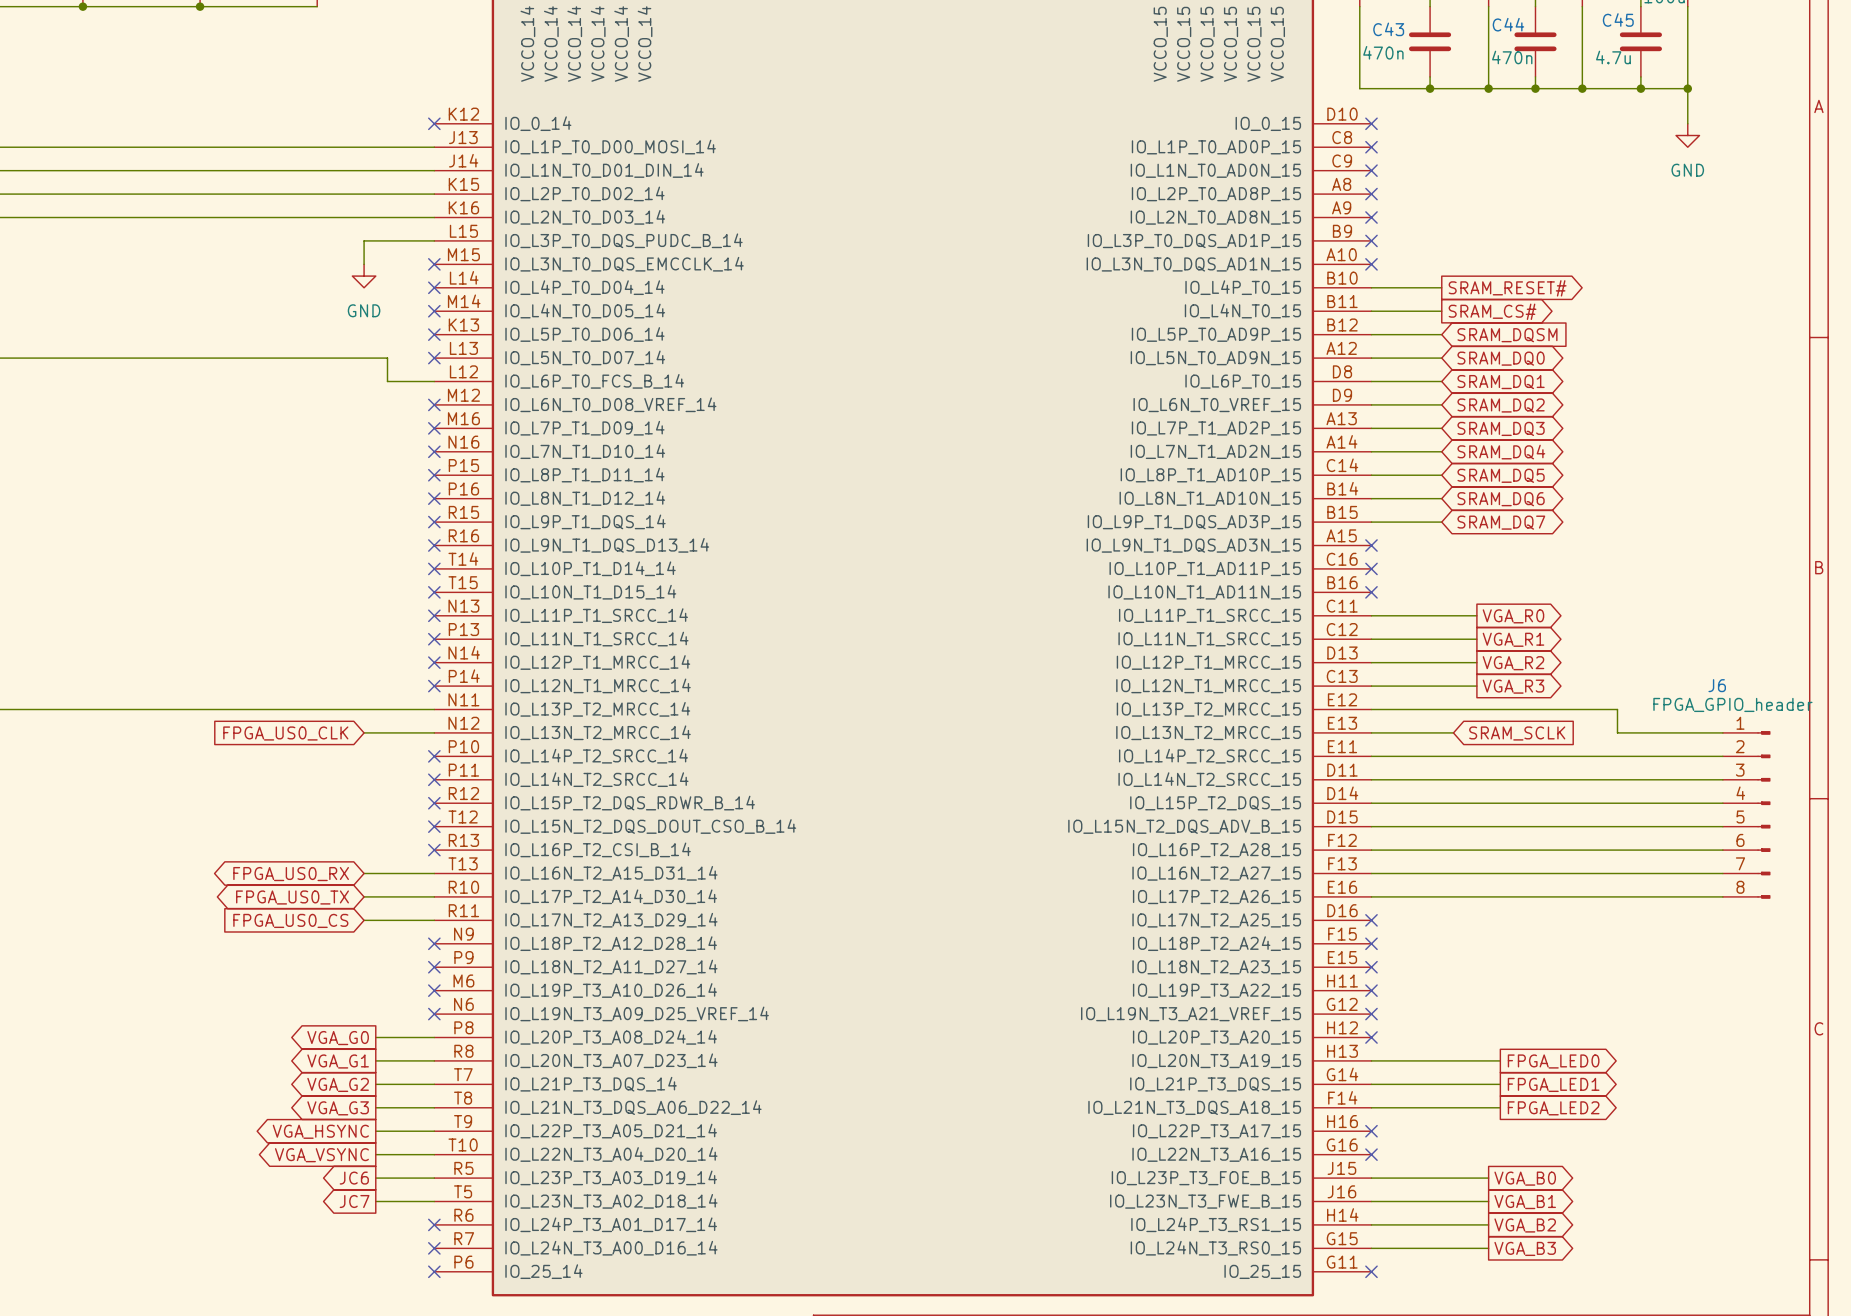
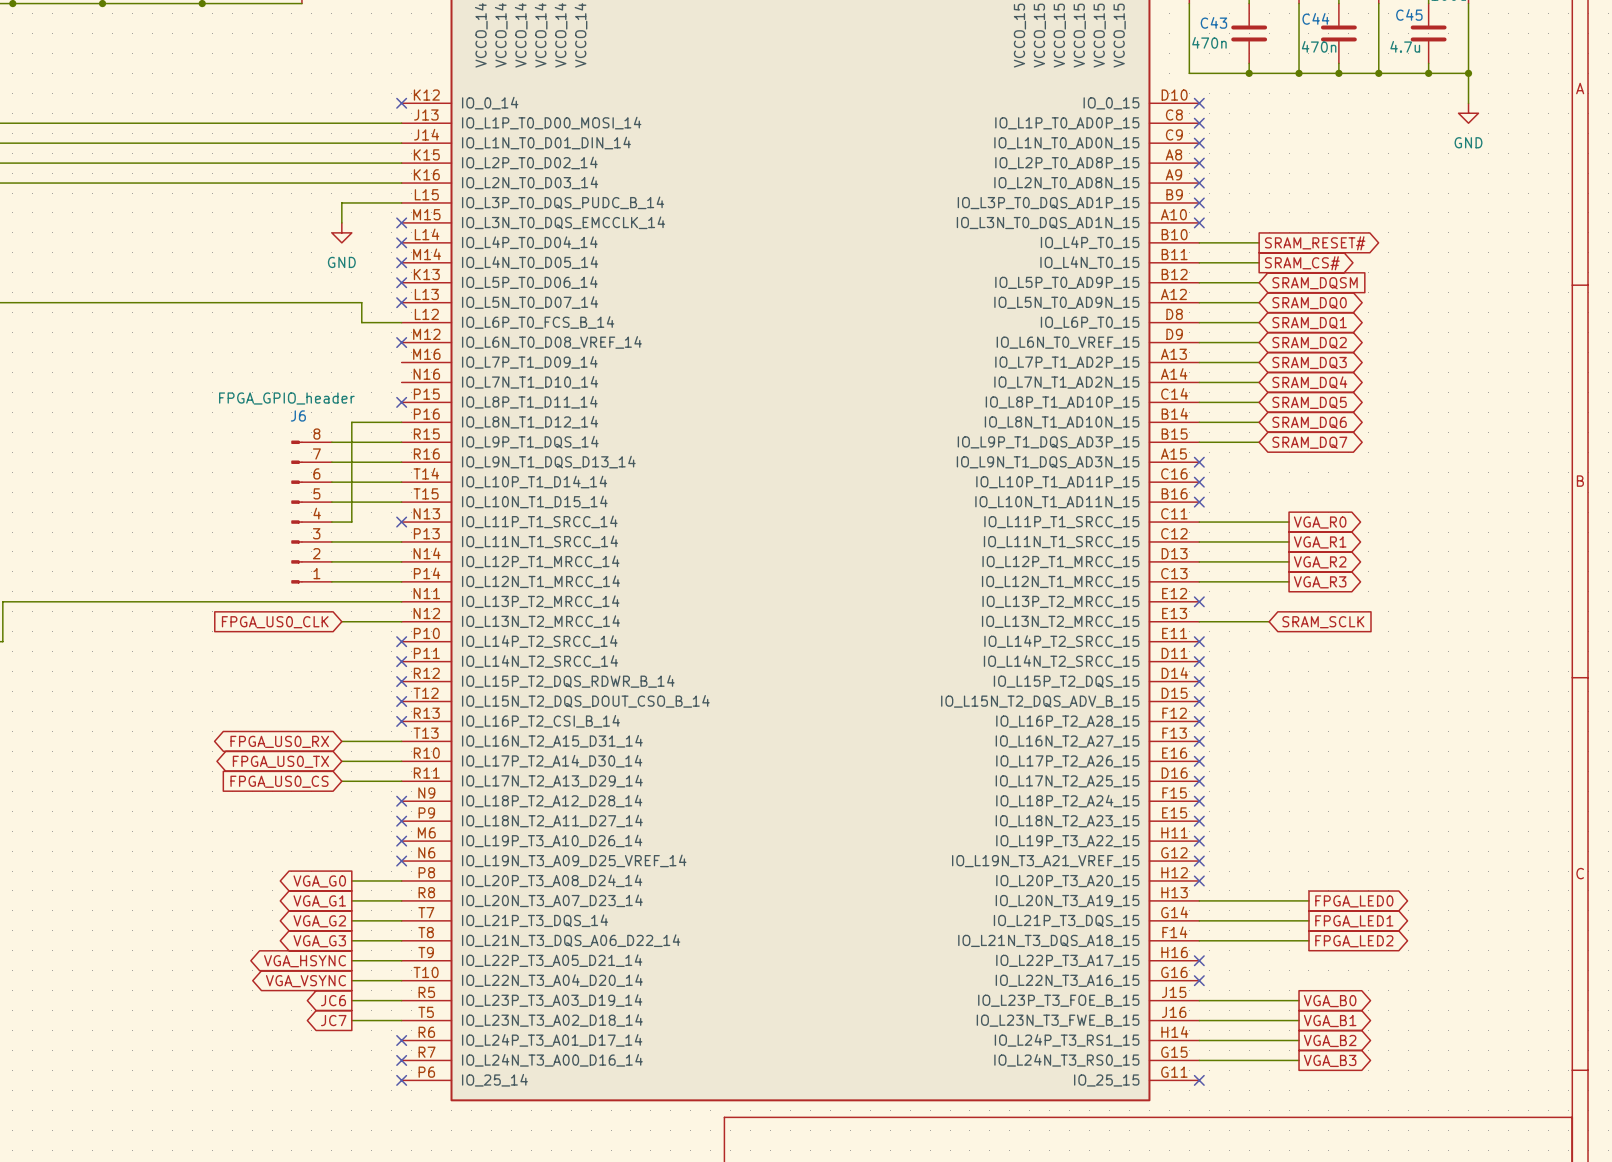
no-connect mark: (434, 428) -> none
no-connect mark: (434, 451) -> none
wire: none -> (401, 422) (351, 422) (351, 522) (331, 522)
no-connect mark: (434, 498) -> none
wire: none -> (331, 442) (401, 442)
no-connect mark: (434, 522) -> none
wire: none -> (331, 462) (401, 462)
no-connect mark: (434, 545) -> none
wire: none -> (331, 482) (401, 482)
no-connect mark: (434, 568) -> none
wire: none -> (331, 502) (401, 502)
no-connect mark: (434, 592) -> none
wire: none -> (331, 541) (401, 541)
no-connect mark: (434, 639) -> none
wire: none -> (331, 561) (401, 561)
no-connect mark: (434, 662) -> none
J6 name position: J6 (1717, 685) -> J6 (298, 415)
wire: none -> (331, 581) (401, 581)
no-connect mark: (434, 686) -> none
J6 value position: FPGA_GPIO_header (1732, 704) -> FPGA_GPIO_header (286, 398)
wire: (1371, 709) (1617, 709) (1617, 732) (1722, 732) -> none
no-connect mark: none -> (1199, 601)
wire: (1371, 756) (1722, 756) -> none
no-connect mark: none -> (1199, 641)
wire: (1371, 779) (1722, 779) -> none
no-connect mark: none -> (1199, 661)
wire: (1371, 803) (1722, 803) -> none
no-connect mark: none -> (1199, 681)
J6 position: (1746, 814) -> (311, 512)
J6 rotation: 0° (1763, 814) -> 180° (296, 512)
wire: (1371, 826) (1722, 826) -> none
no-connect mark: none -> (1199, 701)
wire: (1371, 850) (1722, 850) -> none
no-connect mark: none -> (1199, 721)
wire: (1371, 873) (1722, 873) -> none
no-connect mark: none -> (1199, 741)
wire: (1371, 896) (1722, 896) -> none
no-connect mark: none -> (1199, 761)

